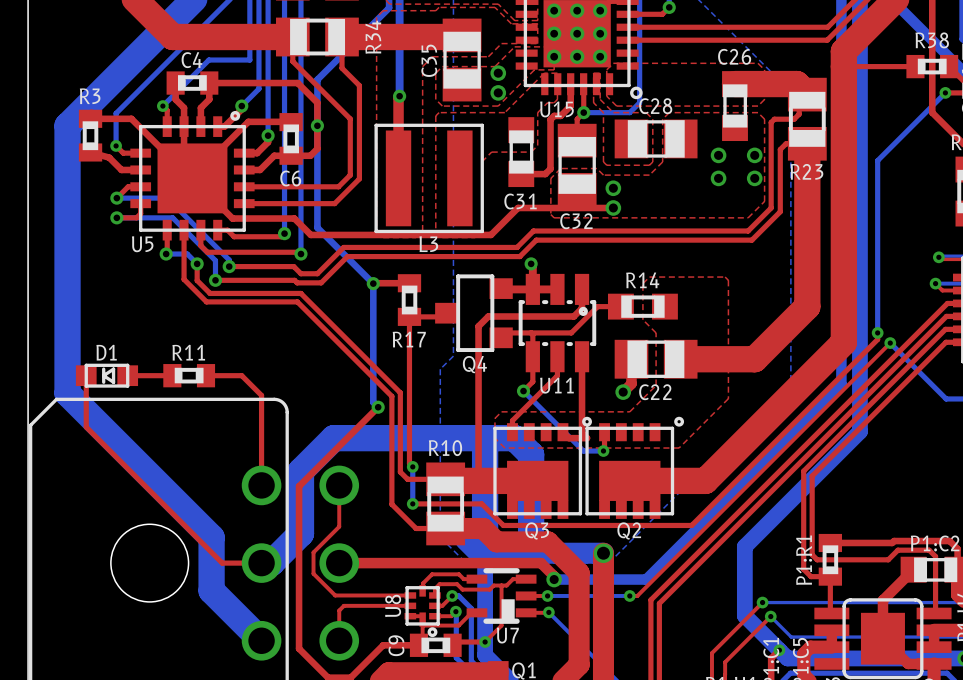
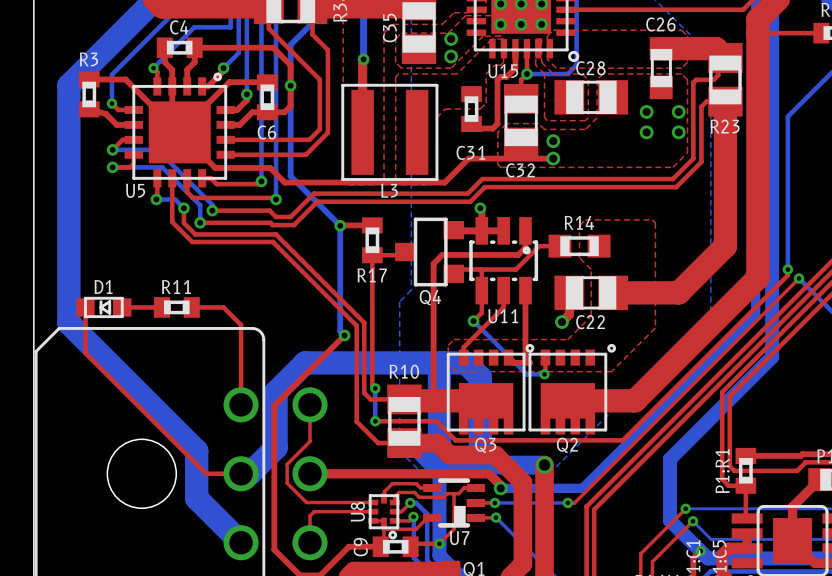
C31 footprint: [508, 117, 535, 188] -> [461, 86, 482, 133]

